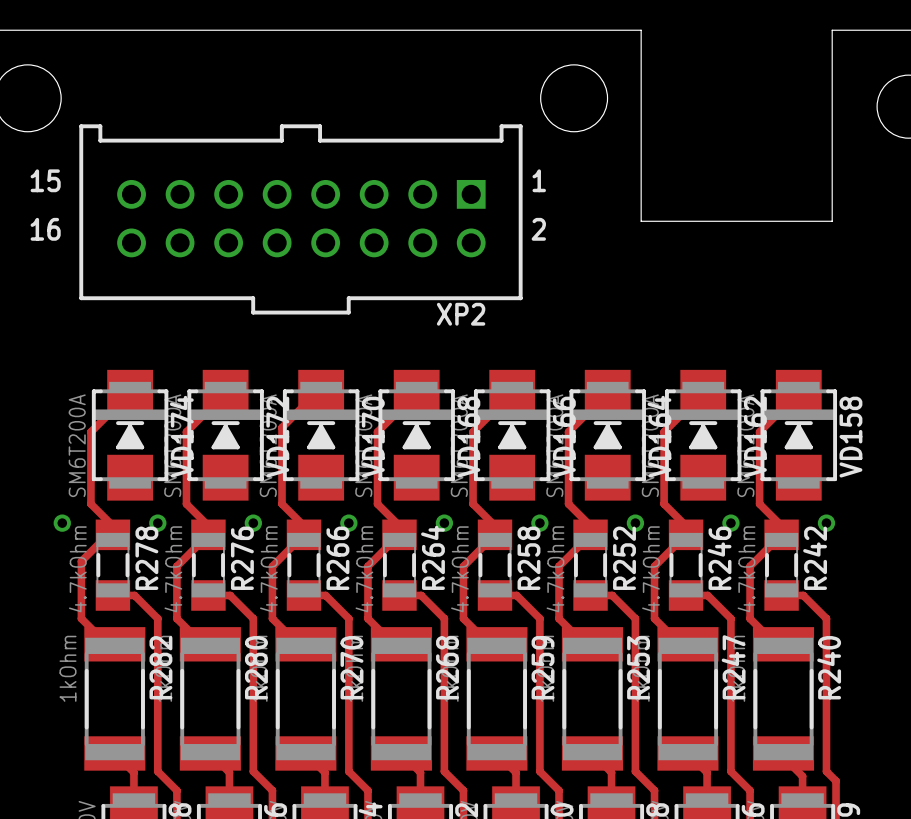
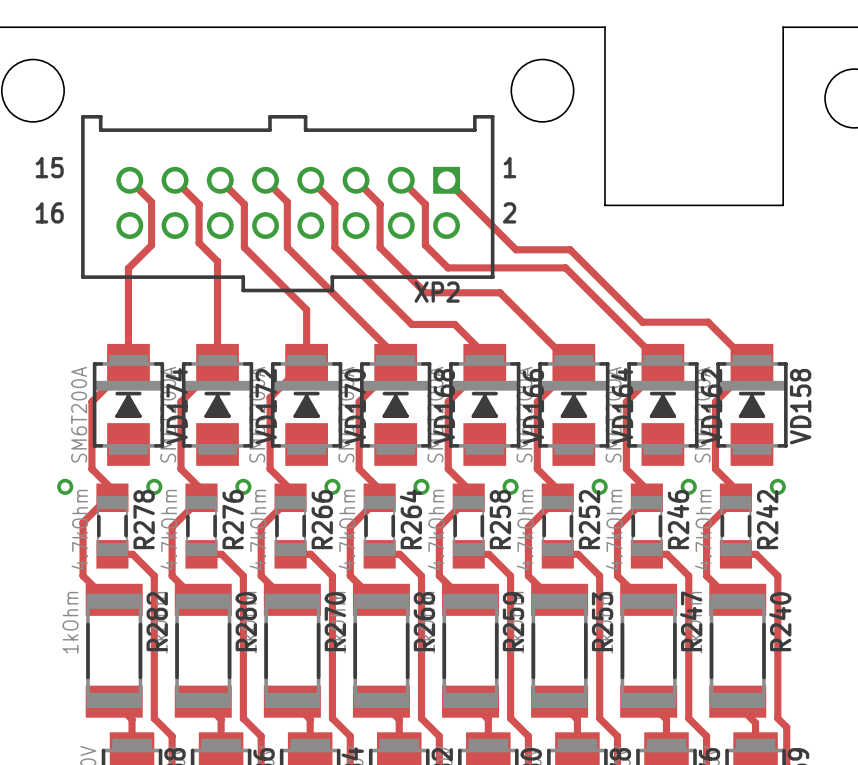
track: none -> (129, 180) (151, 202) (151, 245) (128, 268) (128, 365)
track: none -> (175, 180) (199, 204) (199, 243) (217, 261) (217, 365)
track: none -> (220, 180) (244, 204) (244, 247) (306, 309) (306, 365)
track: none -> (265, 180) (287, 202) (287, 247) (395, 355) (395, 365)
track: none -> (310, 180) (334, 204) (334, 247) (411, 324) (454, 324) (484, 354) (484, 365)
track: none -> (356, 180) (380, 204) (380, 247) (425, 292) (500, 292) (573, 365)
track: none -> (401, 180) (425, 204) (425, 245) (447, 267) (565, 267) (662, 365)
track: none -> (446, 180) (516, 249) (570, 249) (642, 322) (708, 322) (751, 365)

